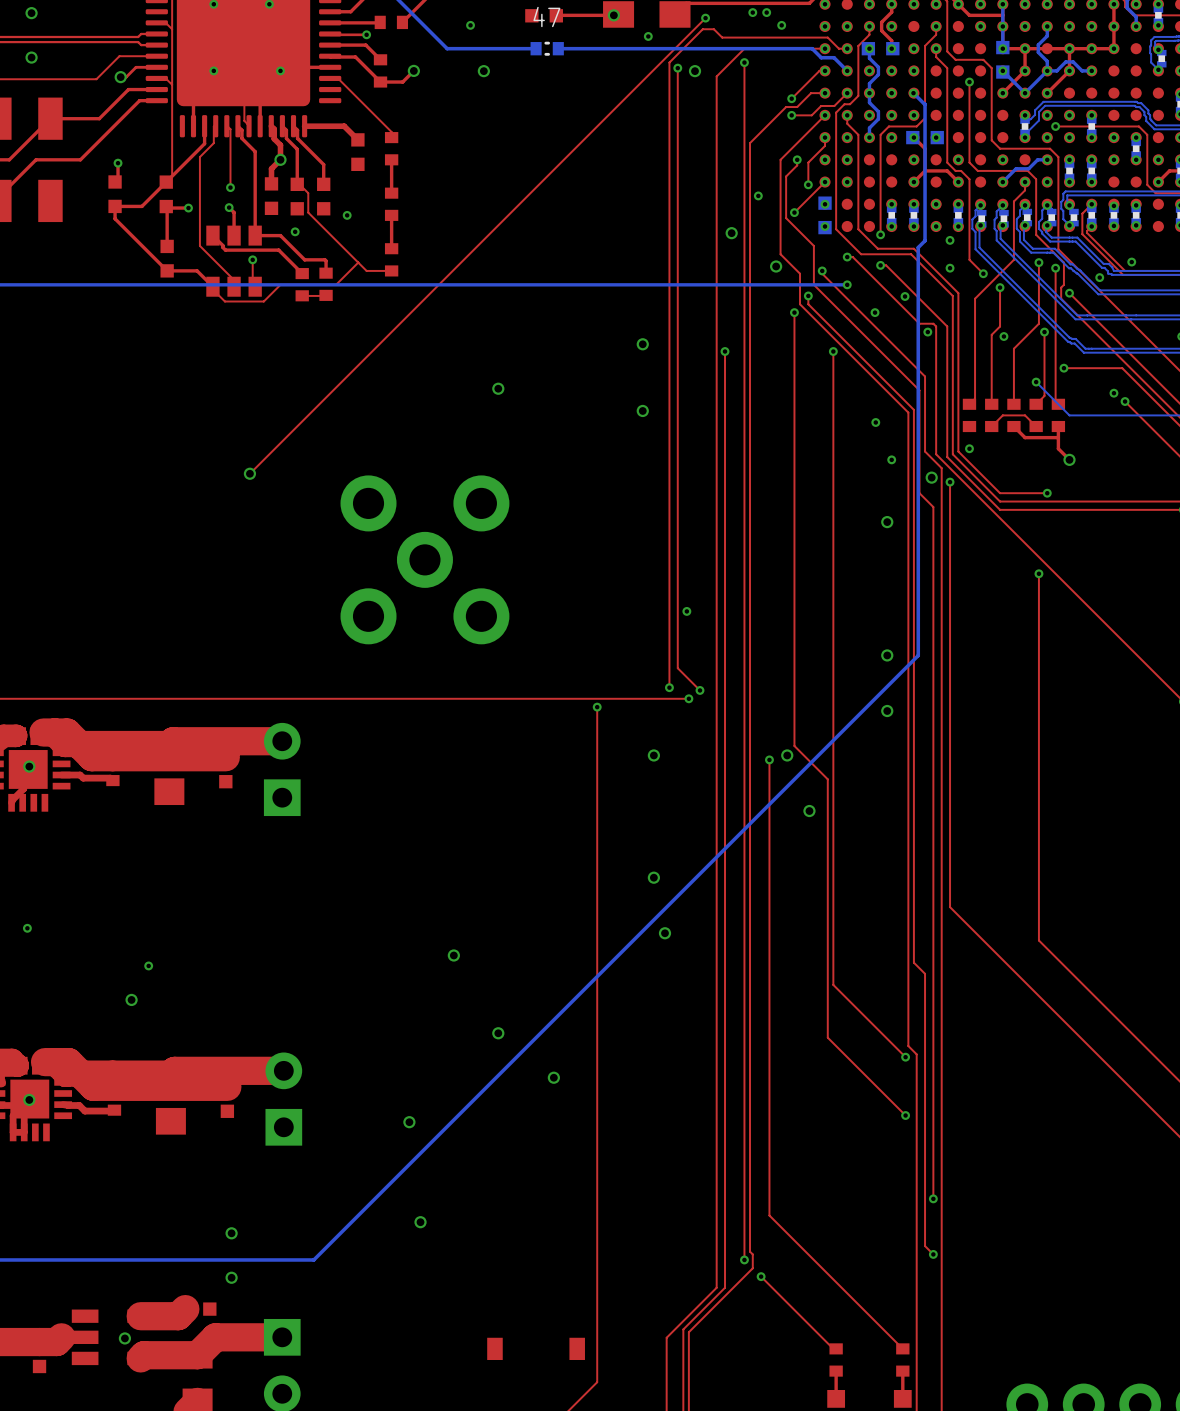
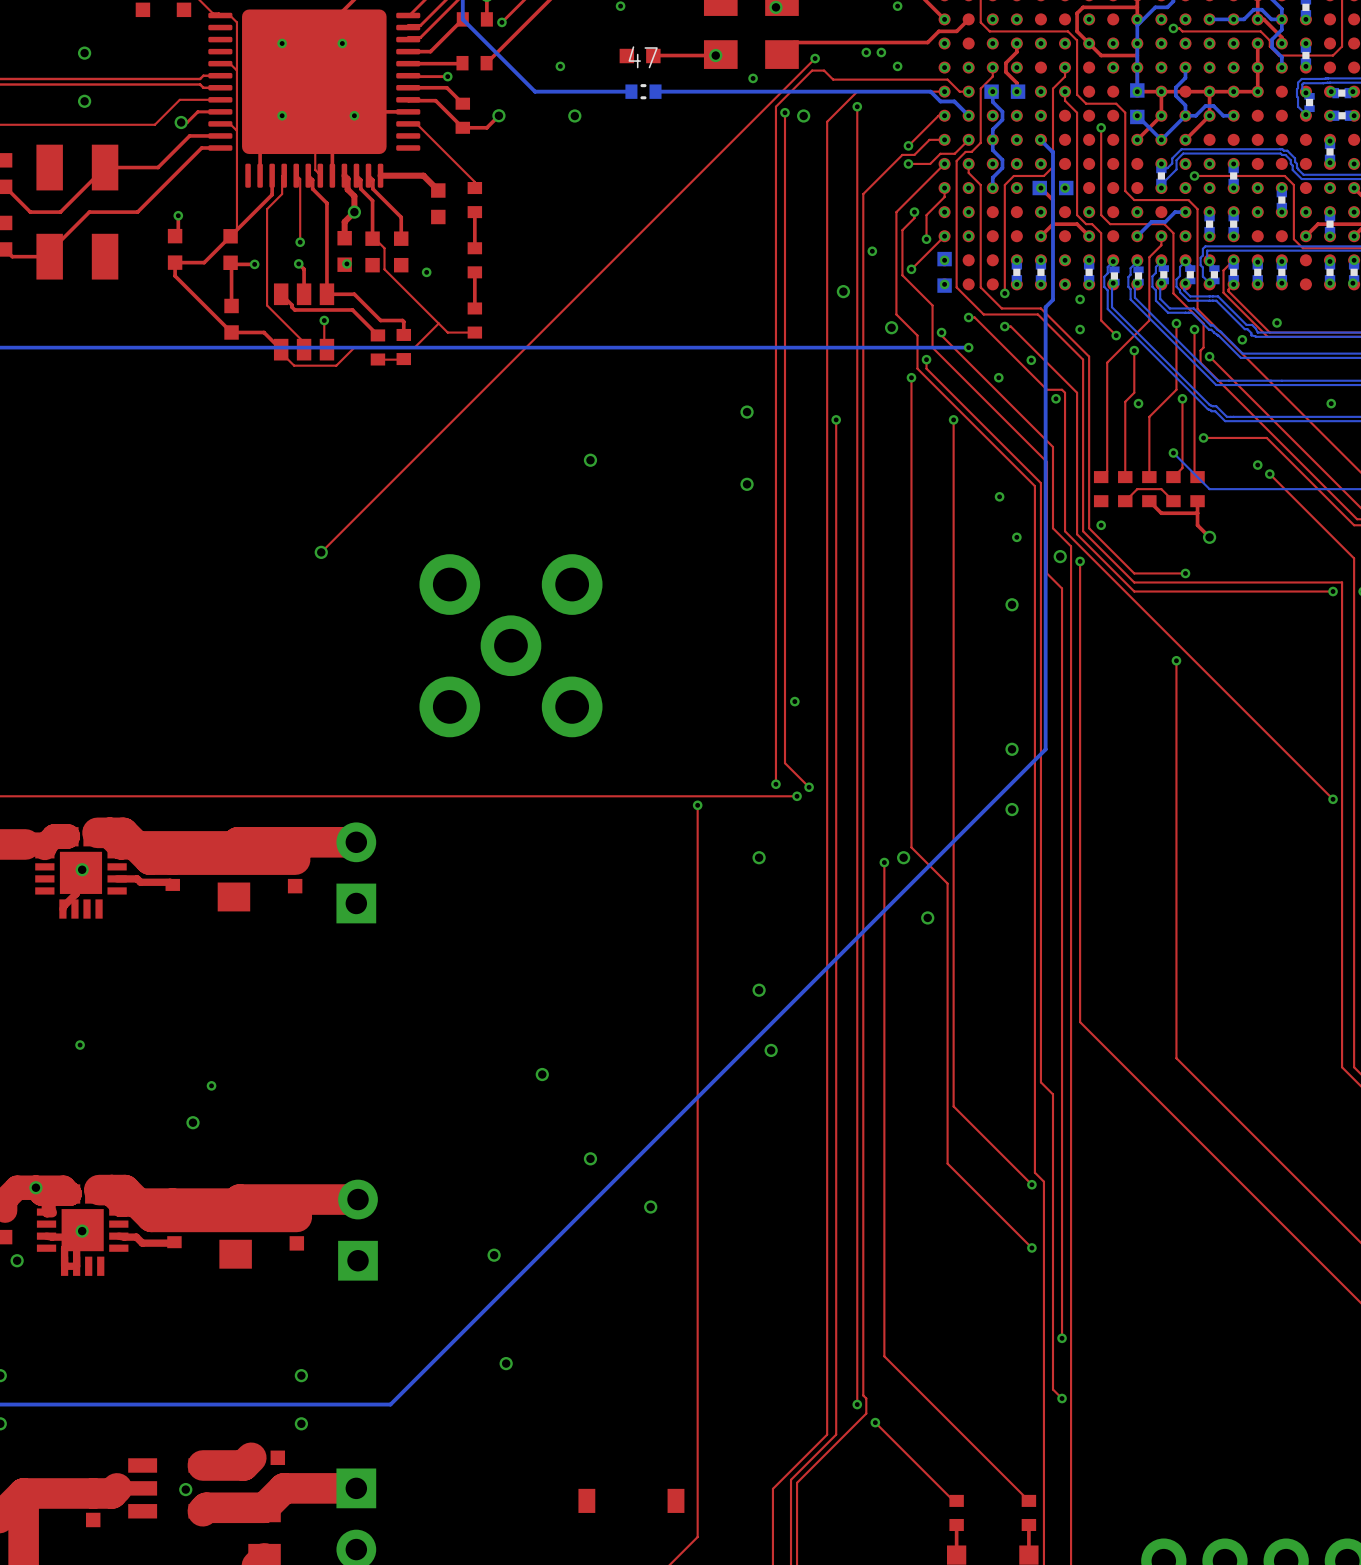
via position: (295, 231) -> (346, 263)

